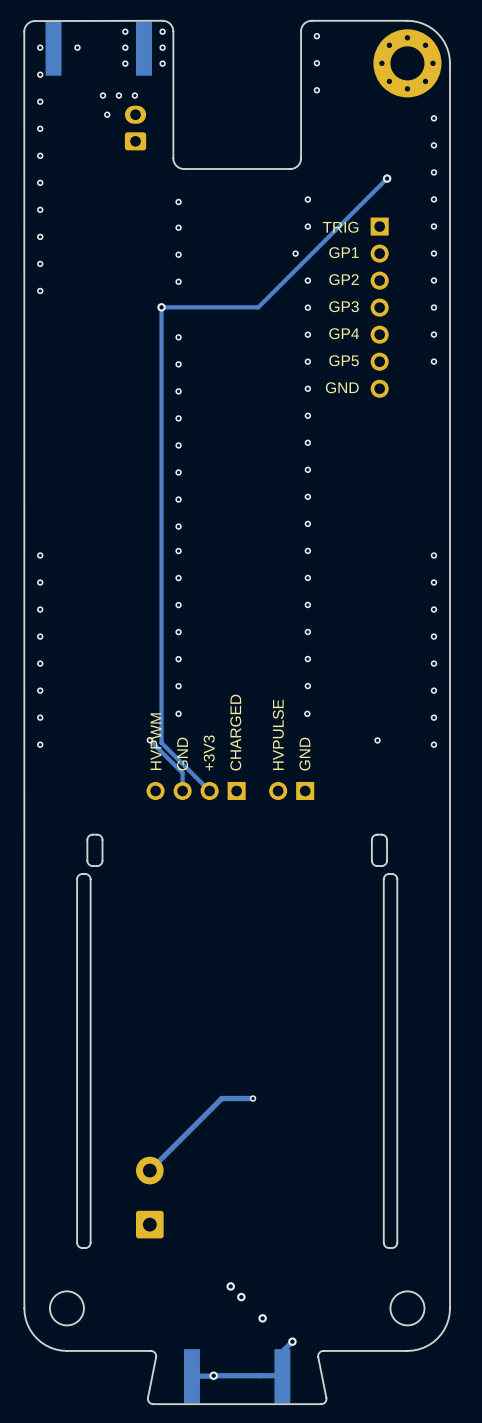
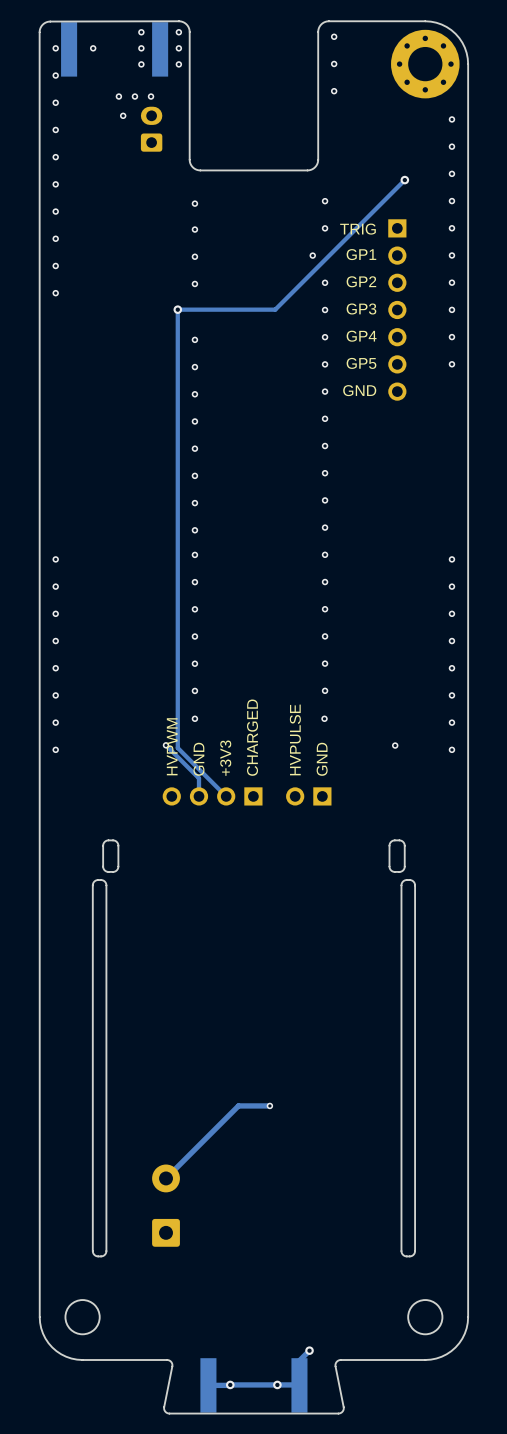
via: (230, 1286) -> none
via: (241, 1297) -> none
via: (262, 1318) -> none
via: none -> (277, 1384)

